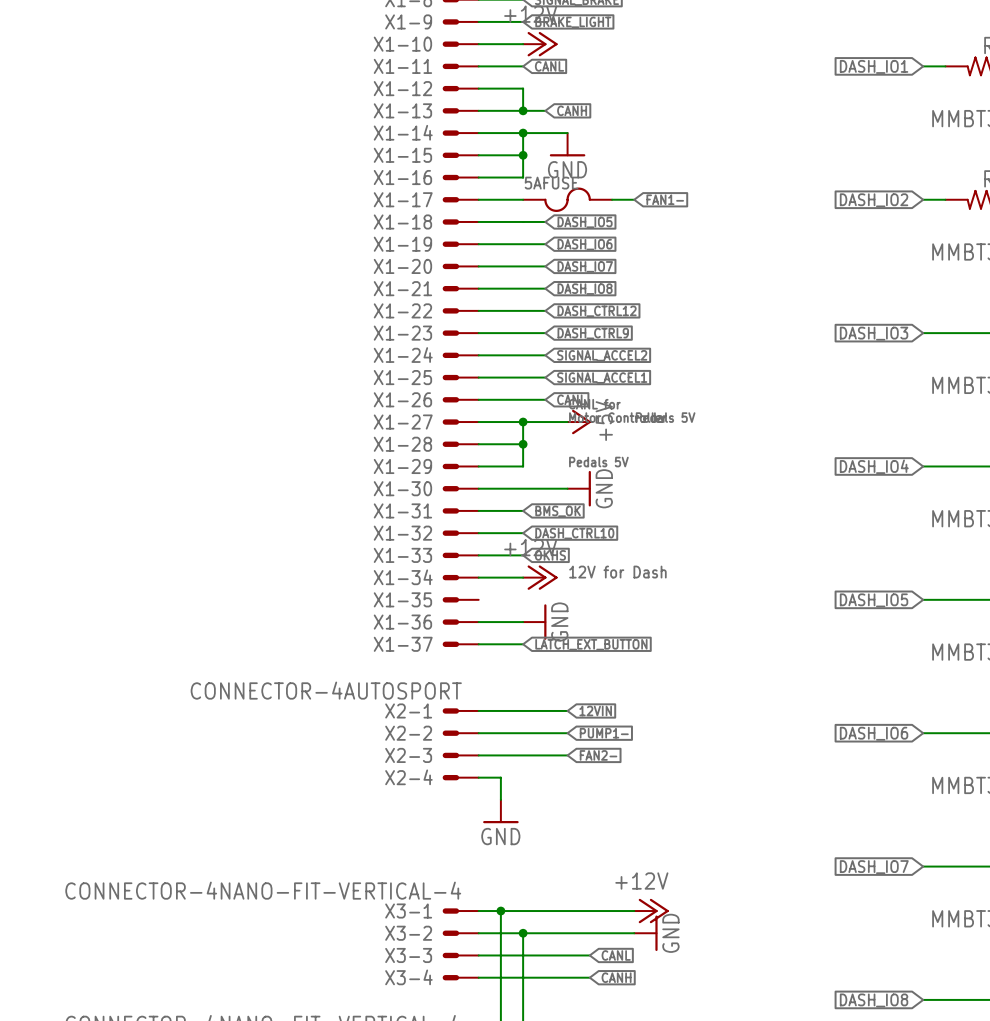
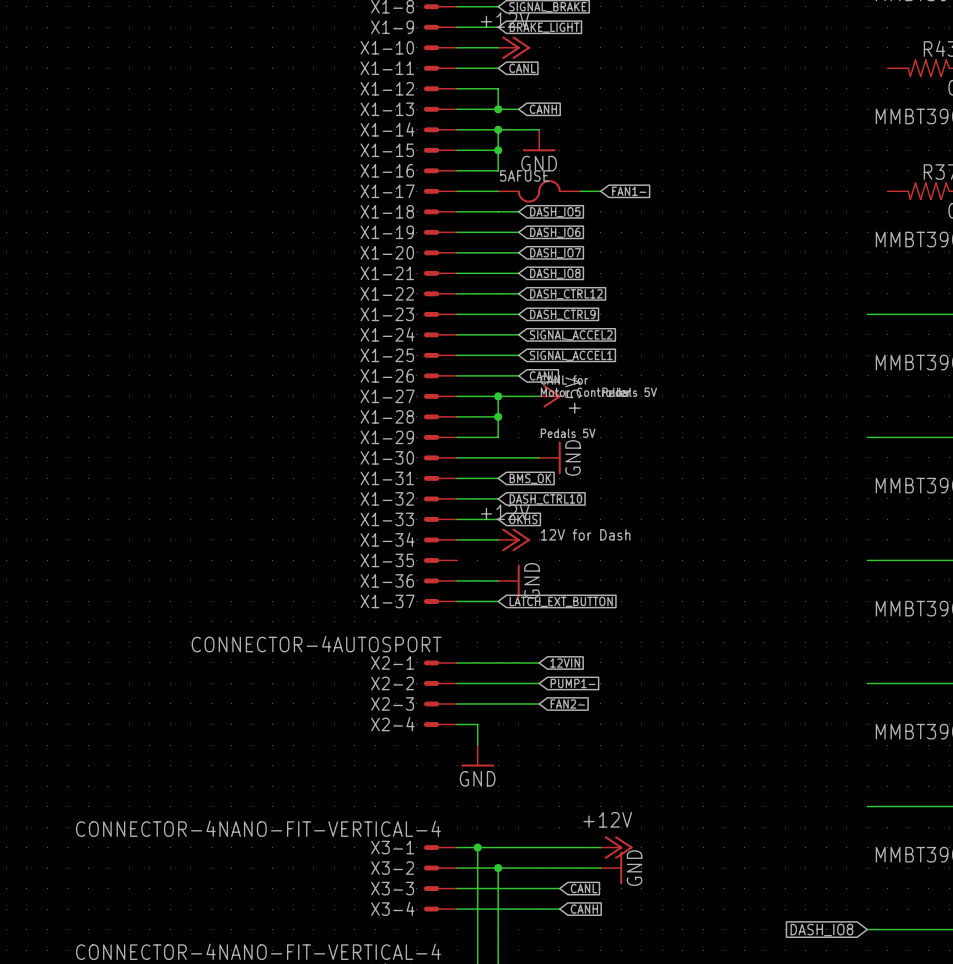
global label: DASH_IO1 (874, 66) -> none
wire: (923, 66) (945, 66) -> none
wire: (923, 199) (945, 199) -> none
global label: DASH_IO2 (874, 200) -> none
global label: DASH_IO3 (874, 333) -> none
global label: DASH_IO4 (874, 466) -> none
global label: DASH_IO5 (874, 600) -> none
global label: DASH_IO6 (874, 733) -> none
global label: DASH_IO7 (874, 867) -> none

